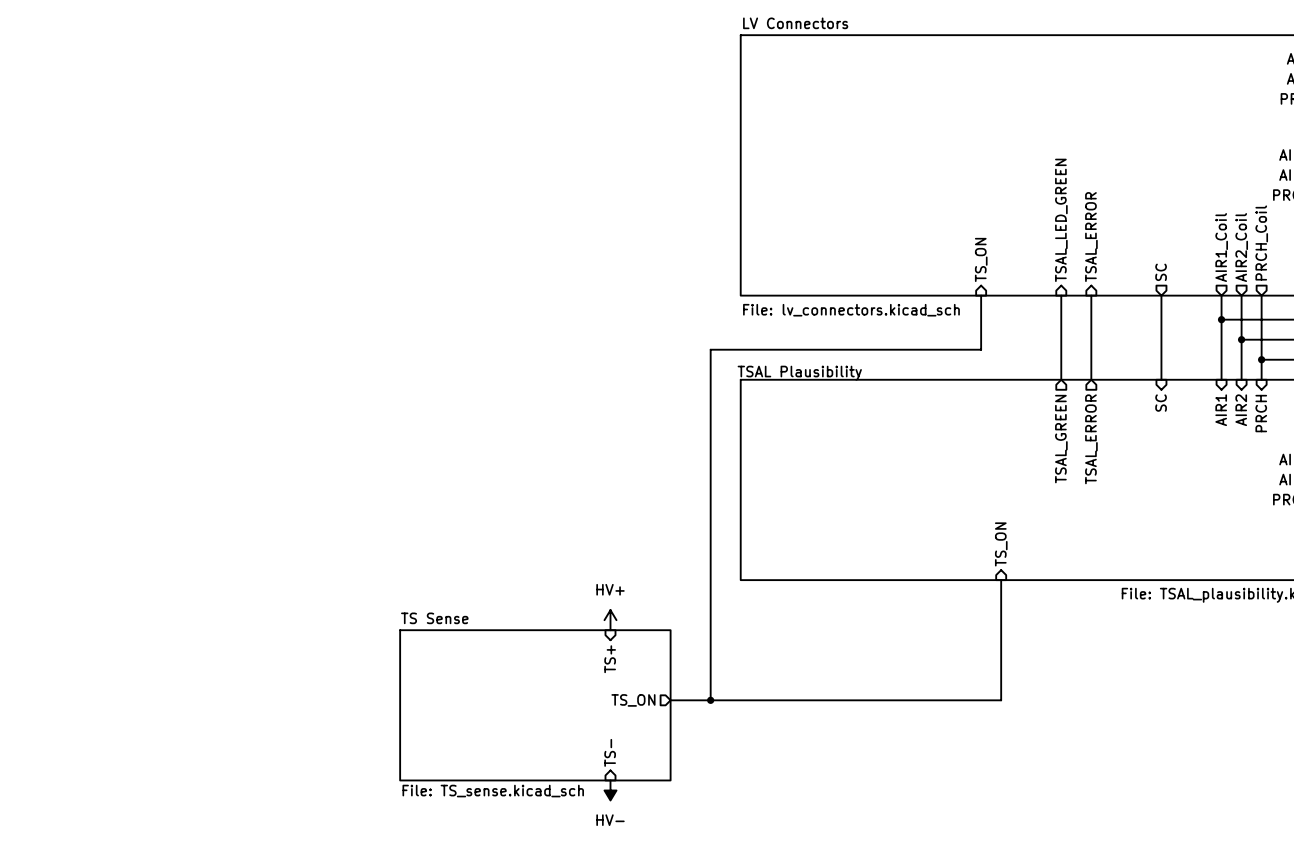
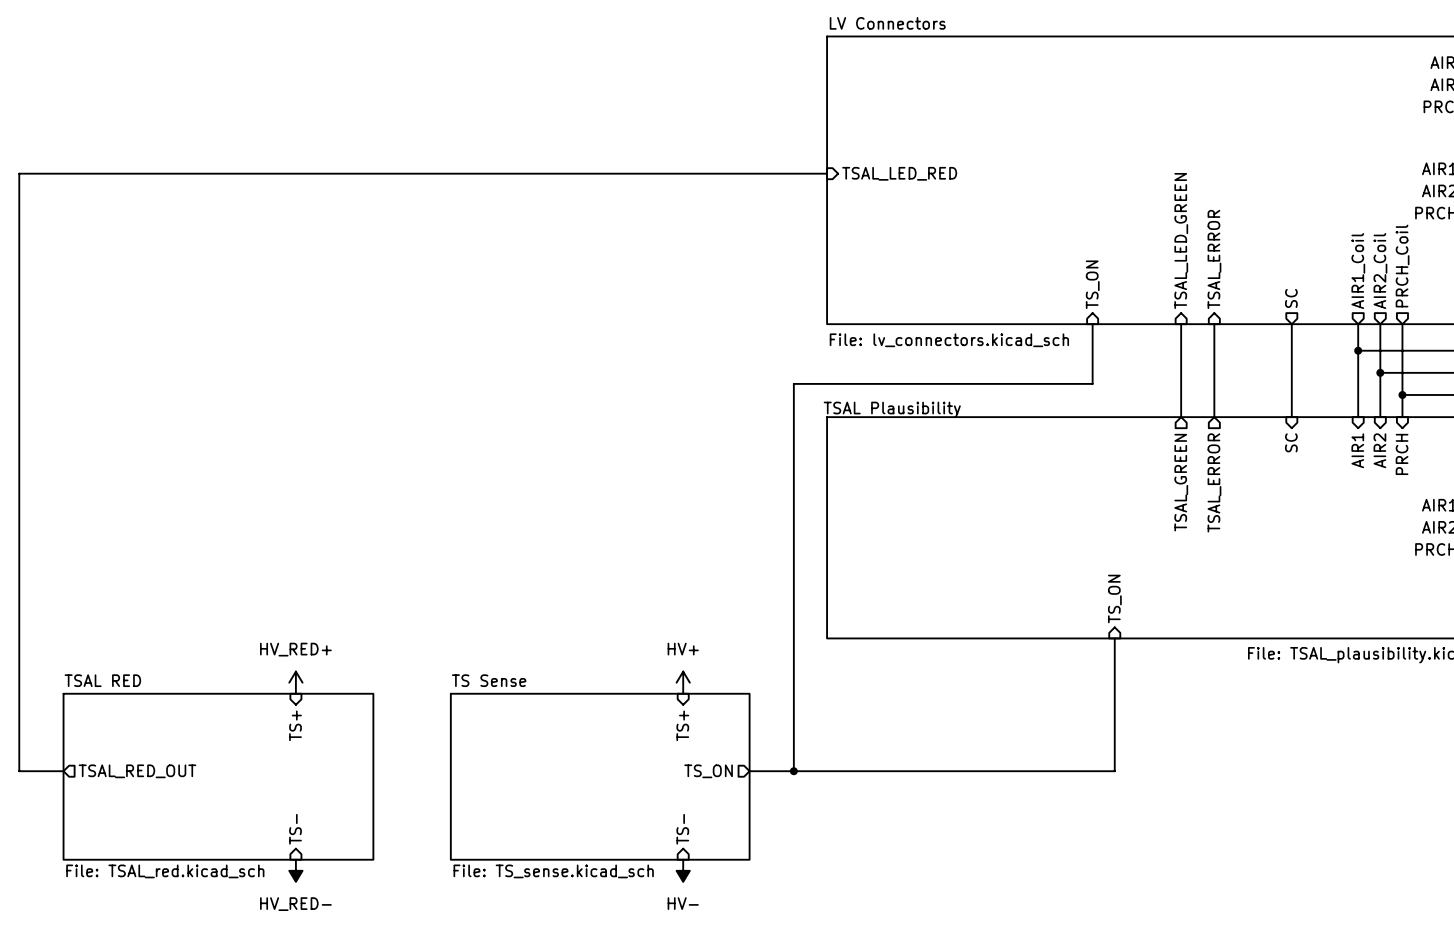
wire: none -> (827, 173) (19, 173) (19, 771) (63, 771)
sheet pin: none -> TSAL_LED_RED (899, 173)
power symbol: none -> HV_RED+ (295, 682)
sheet pin: none -> TS+ (295, 725)
sheet pin: none -> TSAL_RED_OUT (137, 771)
sheet TSAL RED: none -> File: TSAL_red.kicad_sch (218, 776)
sheet pin: none -> TS- (295, 829)
power symbol: none -> HV_RED- (295, 870)

